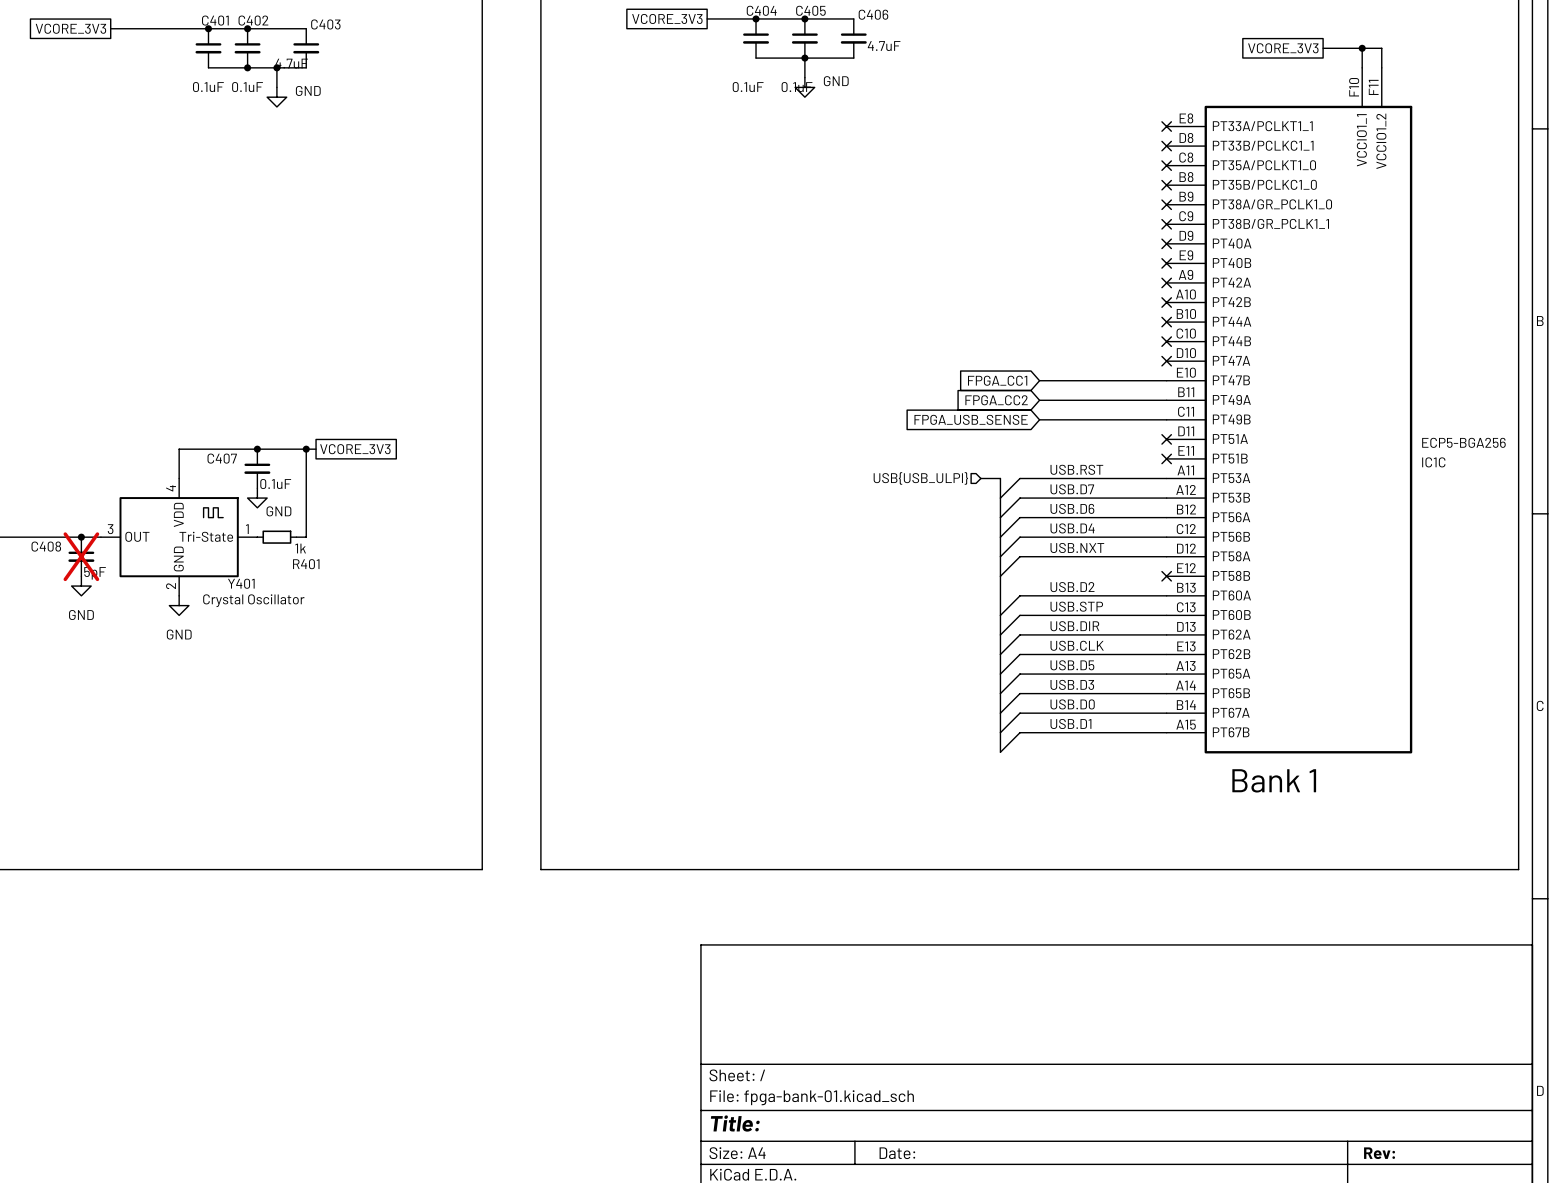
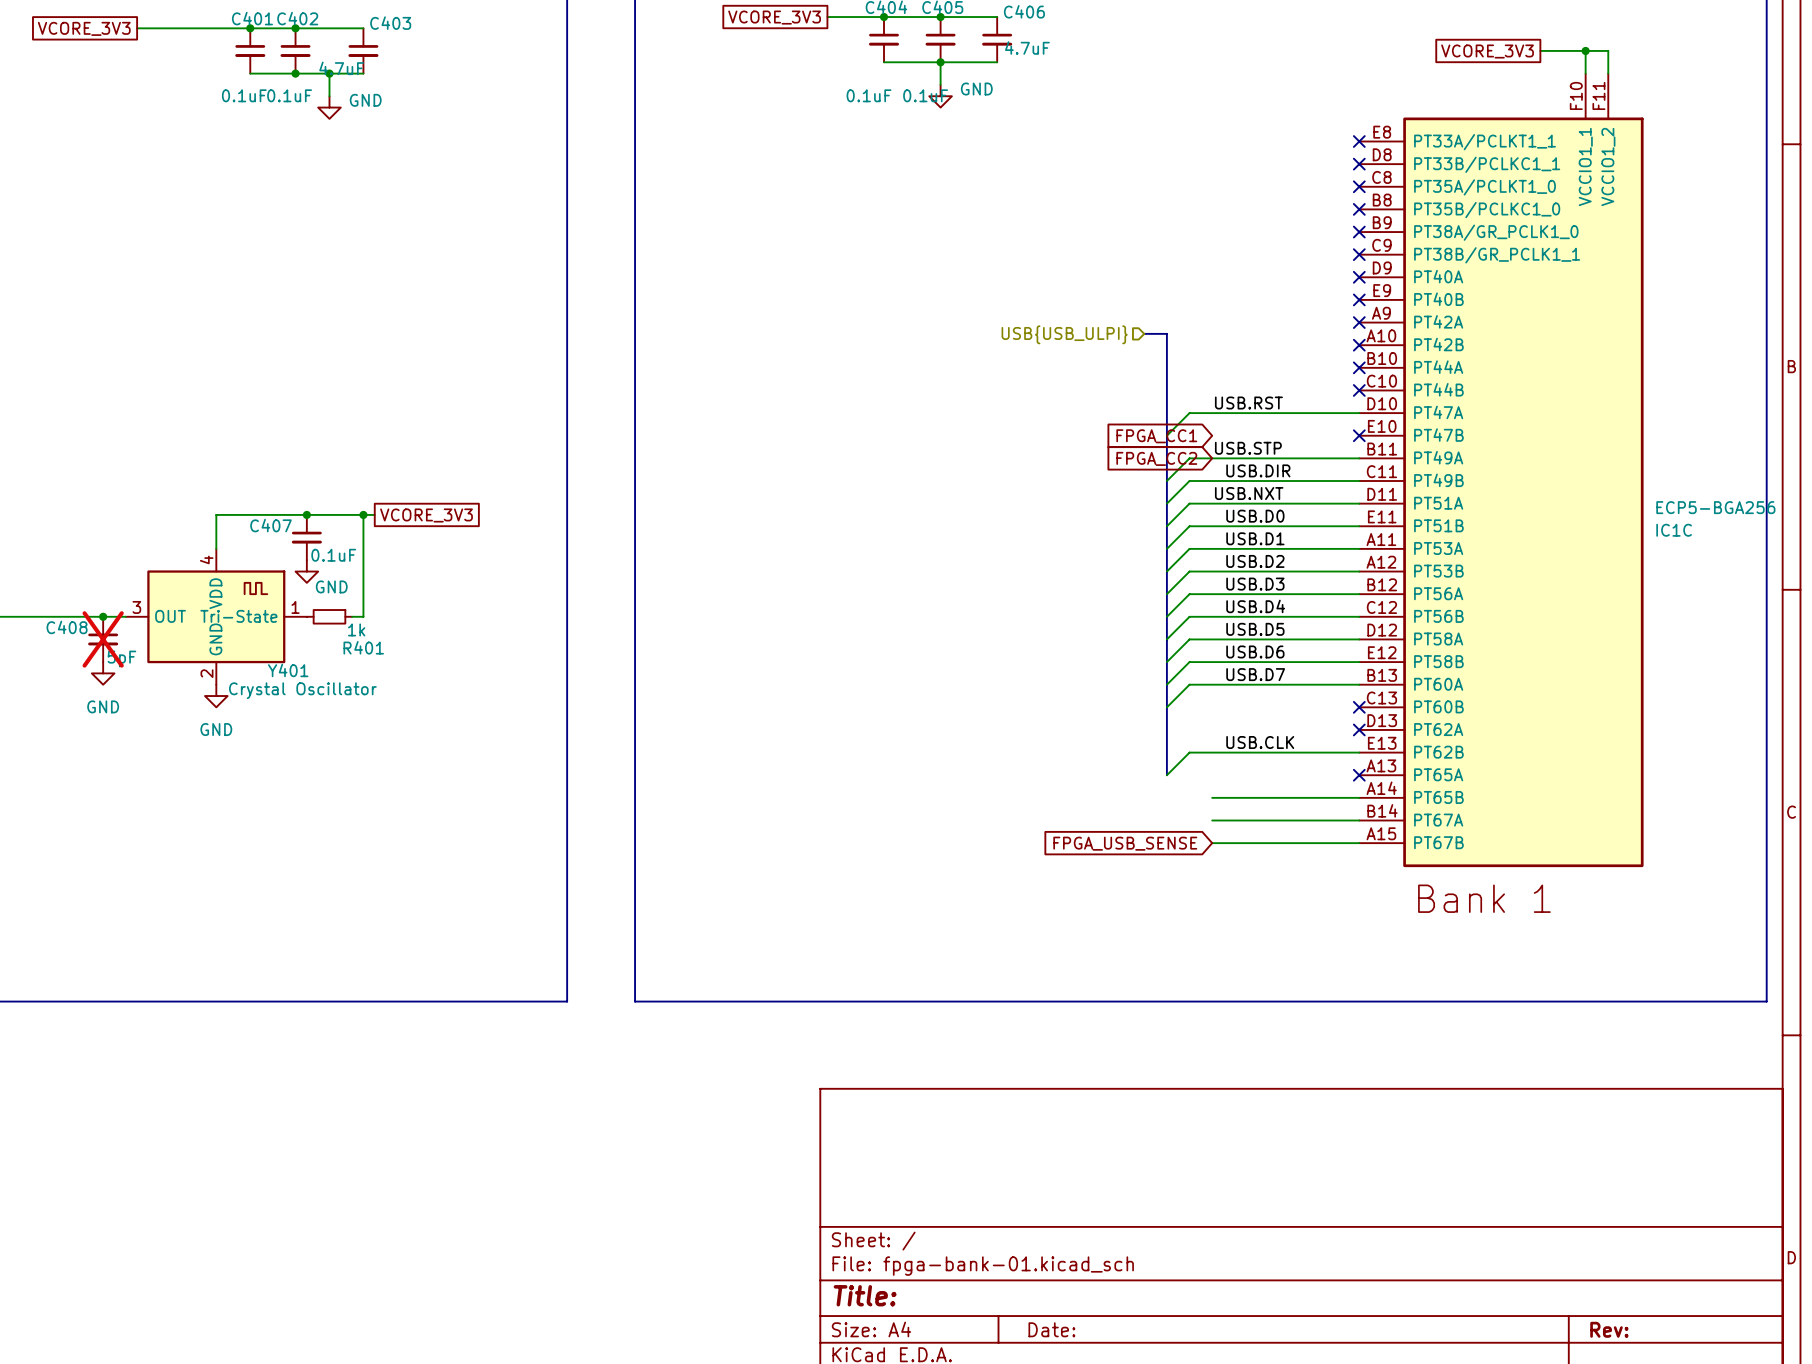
label: none -> USB.RST (1248, 403)
wire: none -> (1359, 413) (1189, 413) (1166, 435)
no-connect mark position: (1166, 361) -> (1359, 435)
wire: (1039, 380) (1166, 380) -> none
label: none -> USB.STP (1248, 448)
wire: none -> (1212, 458) (1189, 458) (1166, 481)
label: none -> USB.DIR (1258, 470)
global label: FPGA_USB_SENSE (971, 419) -> none
wire: none -> (1212, 481) (1189, 481) (1166, 503)
label: none -> USB.NXT (1249, 493)
no-connect mark: (1166, 439) -> none
label: none -> USB.D0 (1255, 516)
no-connect mark: (1166, 458) -> none
label: USB.RST (1076, 469) -> USB.D1 (1255, 538)
hierarchical label position: USB{USB_ULPI} (920, 478) -> USB{USB_ULPI} (1064, 334)
bus: (980, 478) (1000, 478) -> (1144, 333) (1166, 333) (1166, 548)
label: USB.D7 (1072, 489) -> USB.D2 (1255, 561)
label: USB.D6 (1072, 508) -> USB.D3 (1255, 584)
label: USB.NXT (1077, 547) -> USB.D5 (1255, 629)
label: none -> USB.D6 (1255, 651)
no-connect mark: (1166, 576) -> none
label: USB.D2 (1072, 587) -> USB.D7 (1255, 674)
label: USB.STP (1076, 606) -> none
wire: (1166, 615) (1020, 615) (1000, 634) -> (1359, 503) (1189, 503) (1166, 526)
no-connect mark: none -> (1359, 707)
label: USB.DIR (1074, 626) -> none
wire: (1166, 634) (1020, 634) (1000, 654) -> (1359, 526) (1189, 526) (1166, 548)
no-connect mark: none -> (1359, 729)
label: USB.D5 (1072, 665) -> none
bus: (1000, 674) (1000, 752) -> none
wire: (1166, 674) (1020, 674) (1000, 693) -> (1359, 662) (1189, 662) (1166, 684)
no-connect mark: none -> (1359, 775)
label: USB.D3 (1072, 684) -> none
wire: (1039, 693) (1020, 693) (1000, 713) -> none
label: USB.D0 (1072, 704) -> none
wire: (1039, 713) (1020, 713) (1000, 732) -> none
label: USB.D1 (1070, 723) -> none
global label: none -> FPGA_USB_SENSE (1125, 843)
wire: (1039, 732) (1020, 732) (1000, 752) -> none

